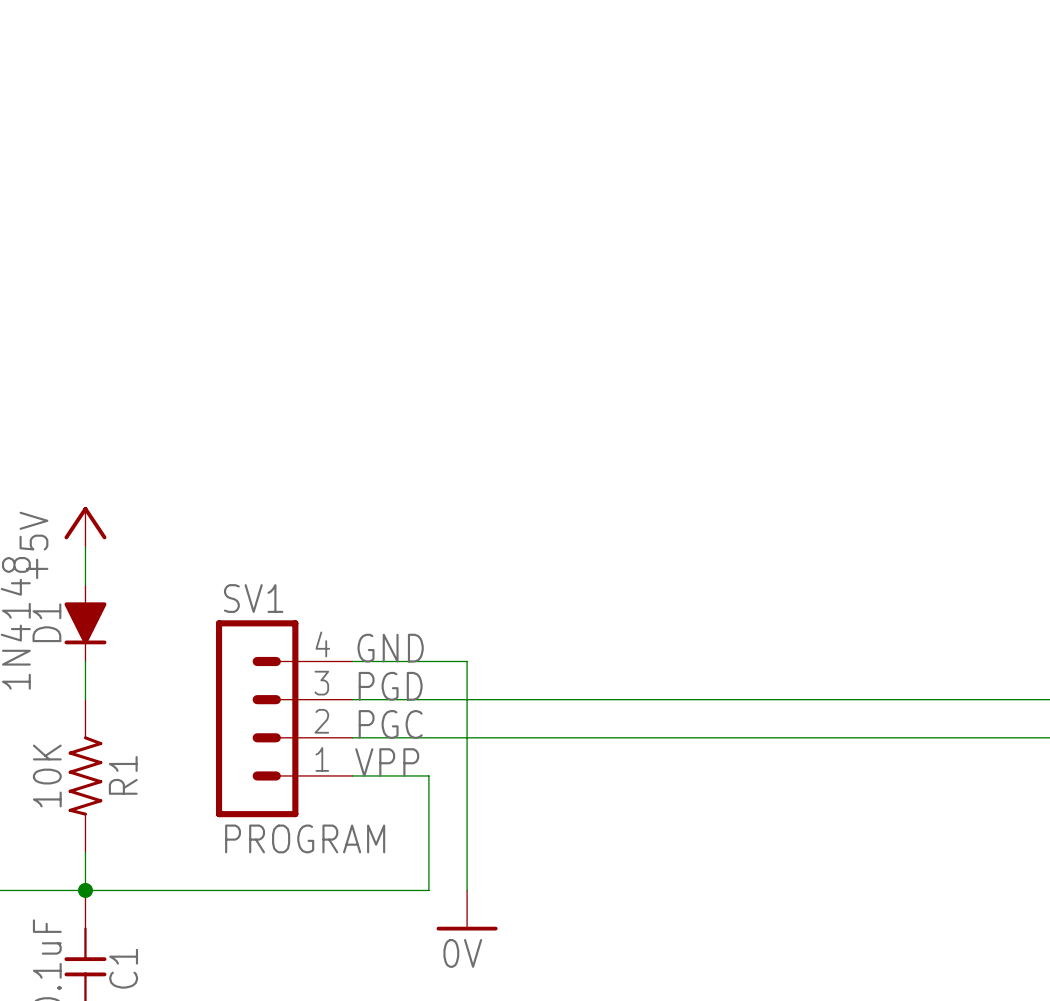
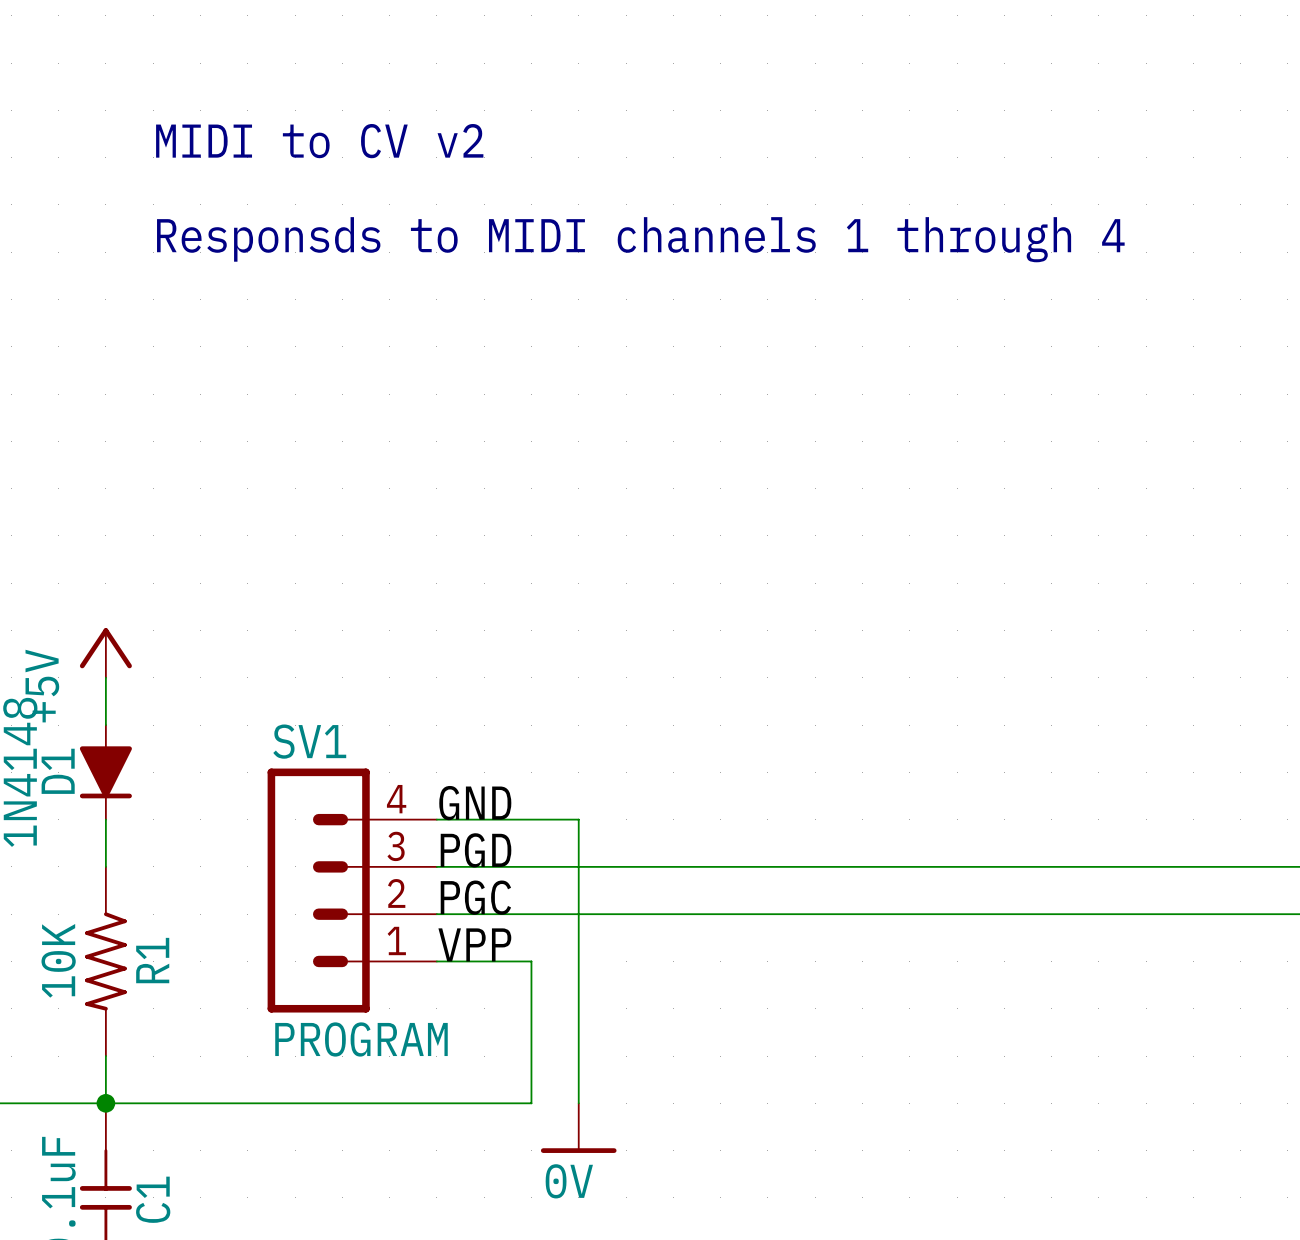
text: none -> MIDI to CV v2 (319, 141)
text: none -> Responsds to MIDI channels 1 through 4 (640, 239)

